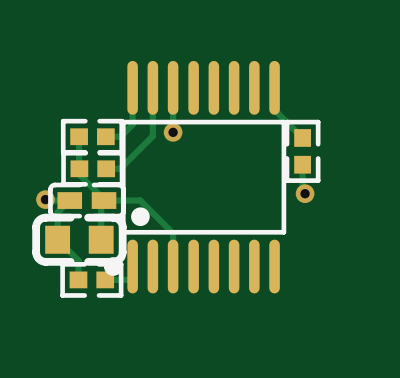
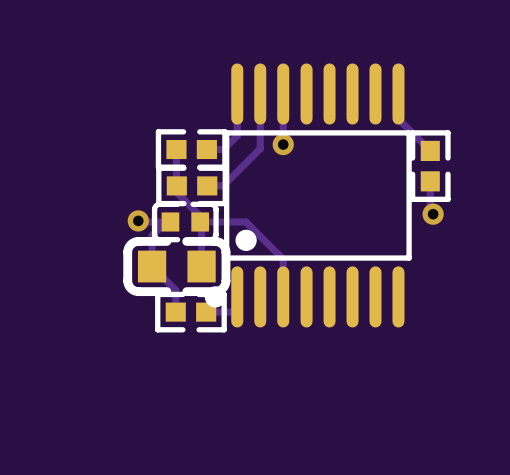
part footprint: [48, 182, 126, 219] -> [151, 201, 219, 243]

